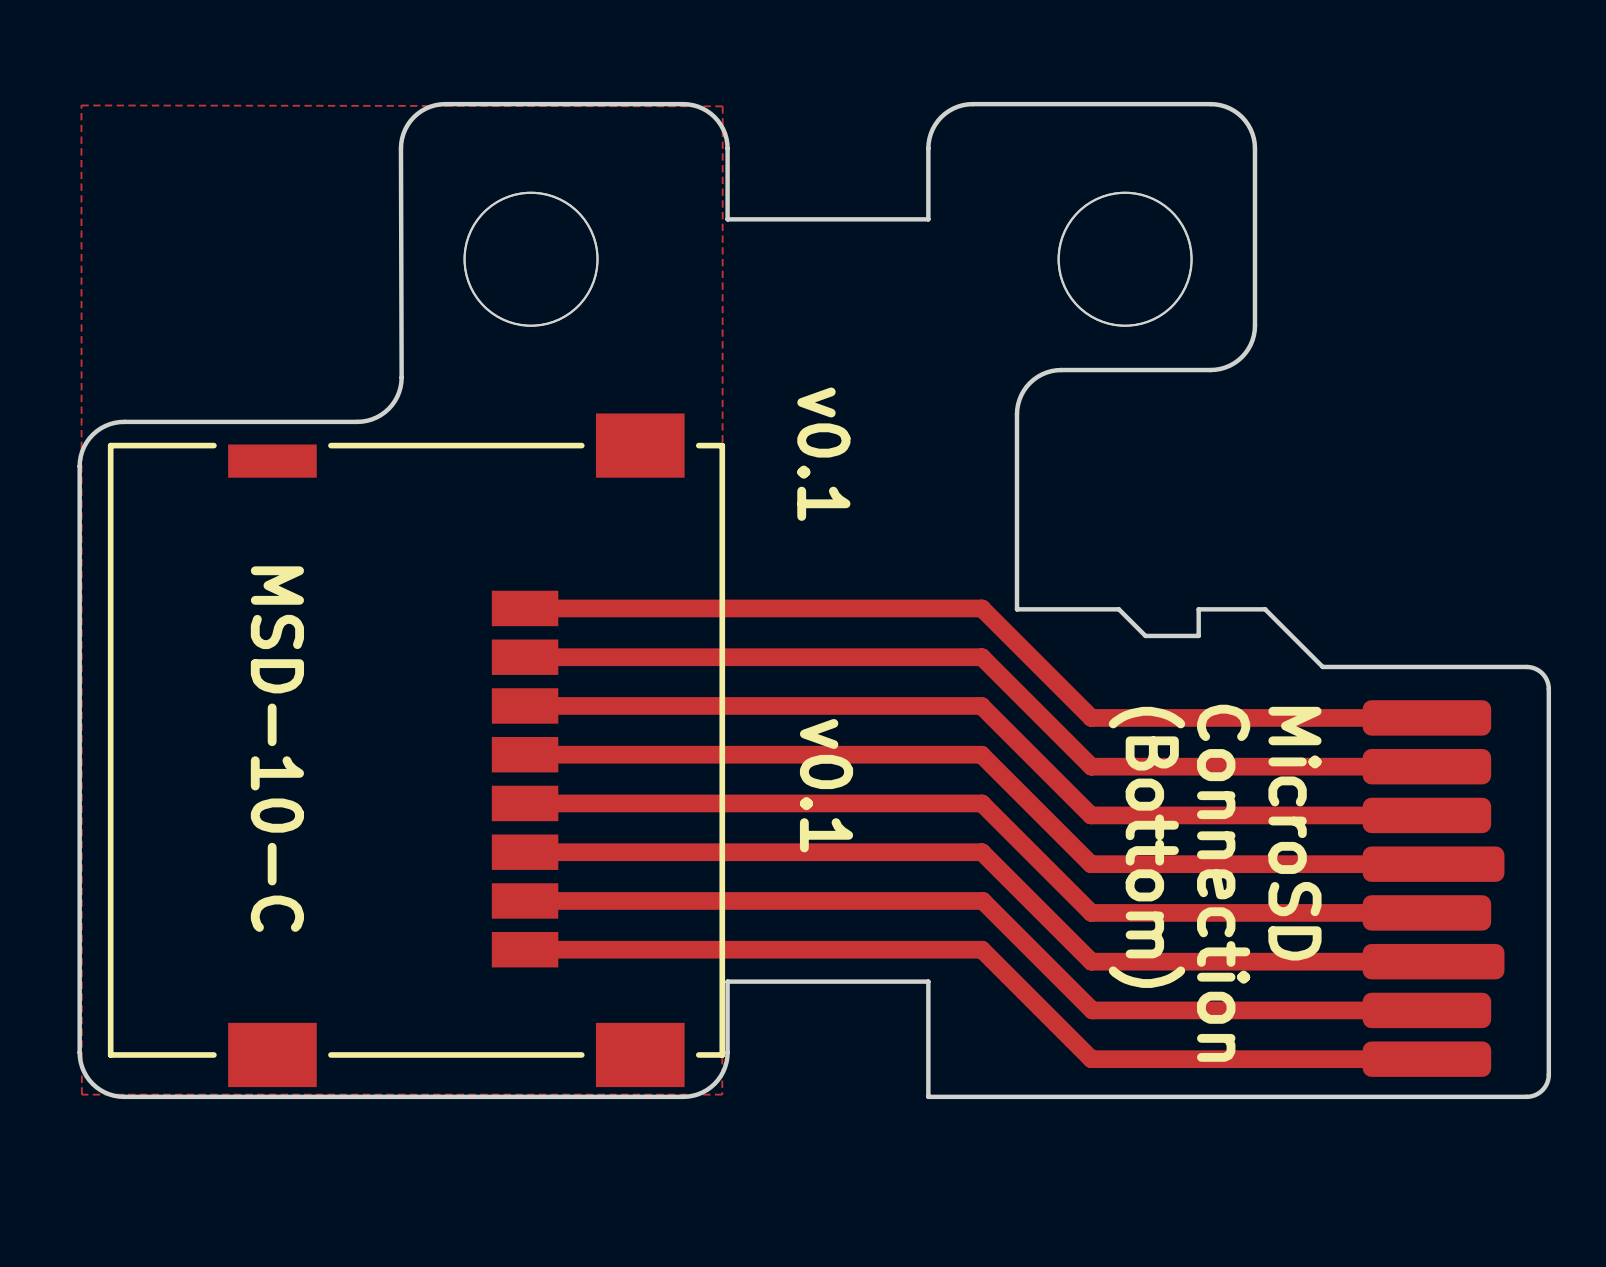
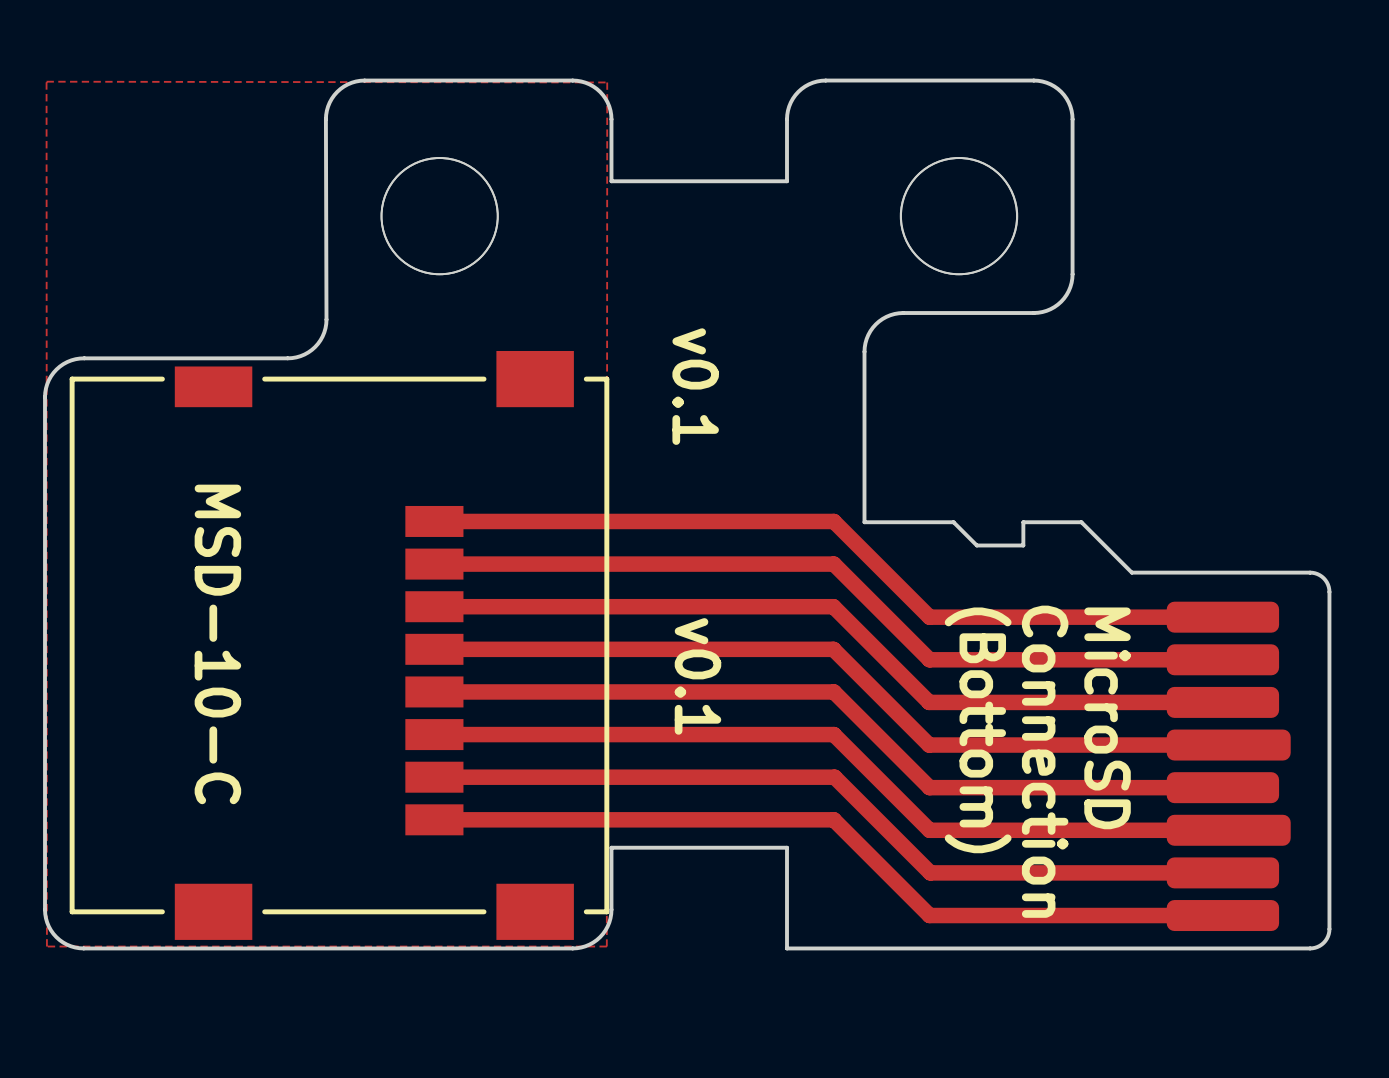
part footprint: [107, 413, 726, 1088] -> [69, 350, 610, 940]

